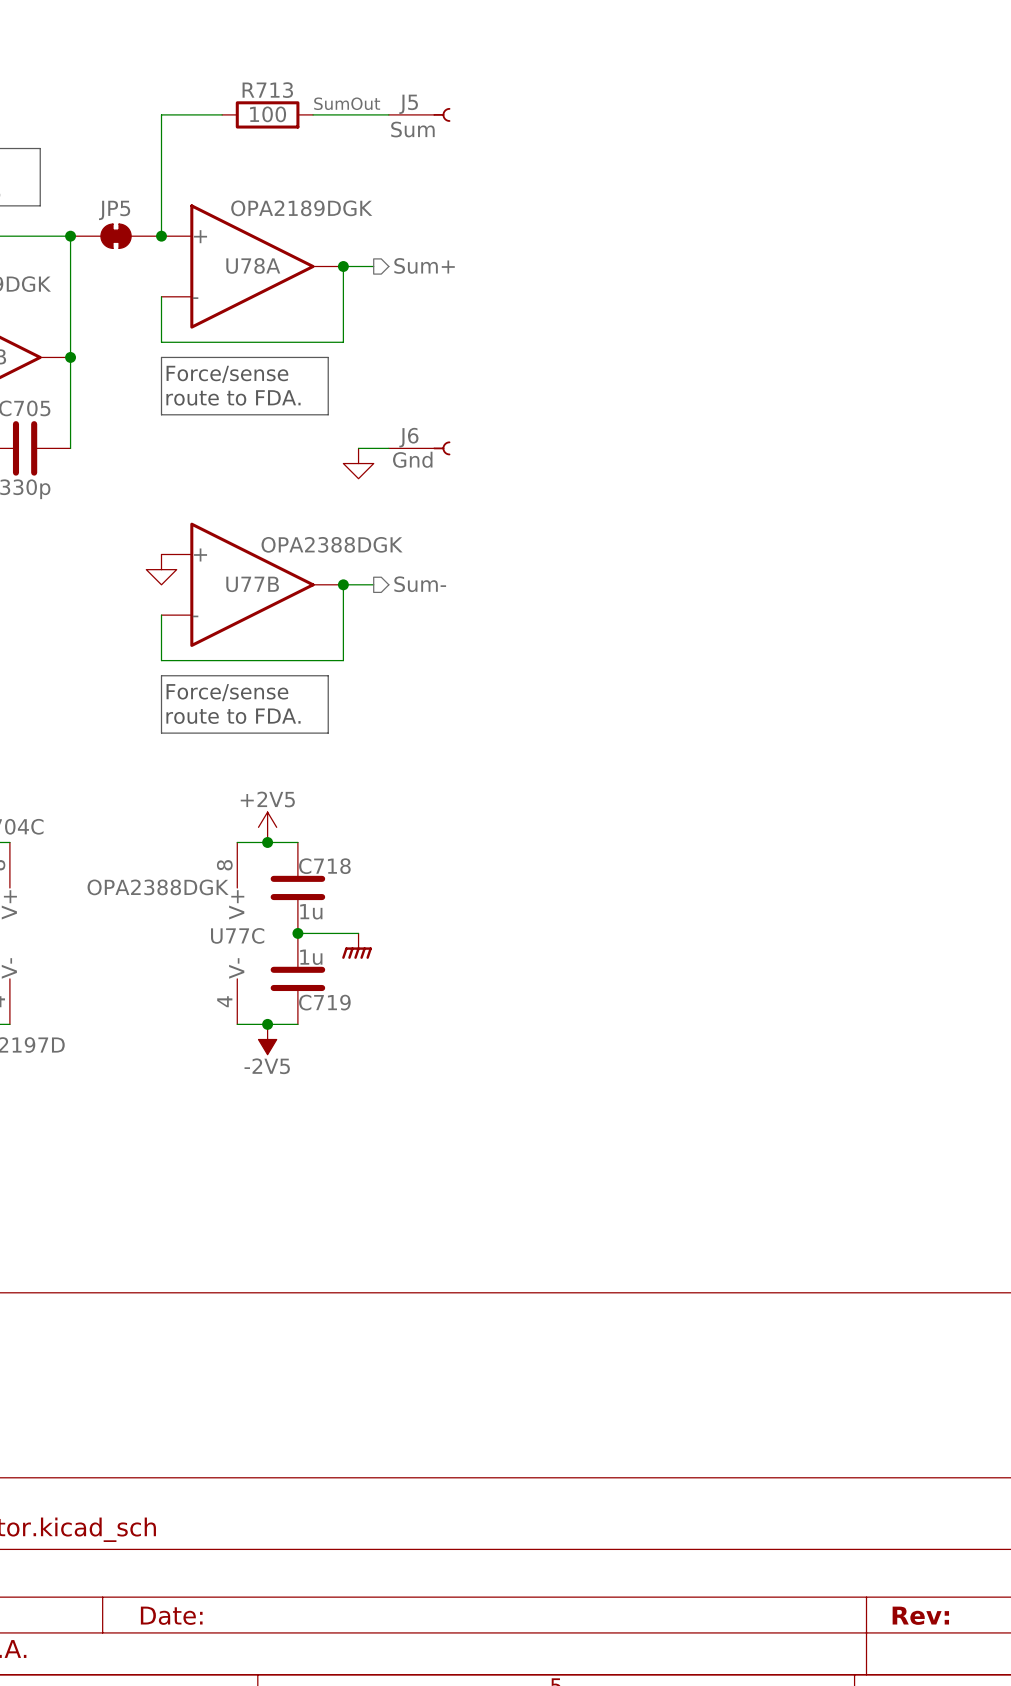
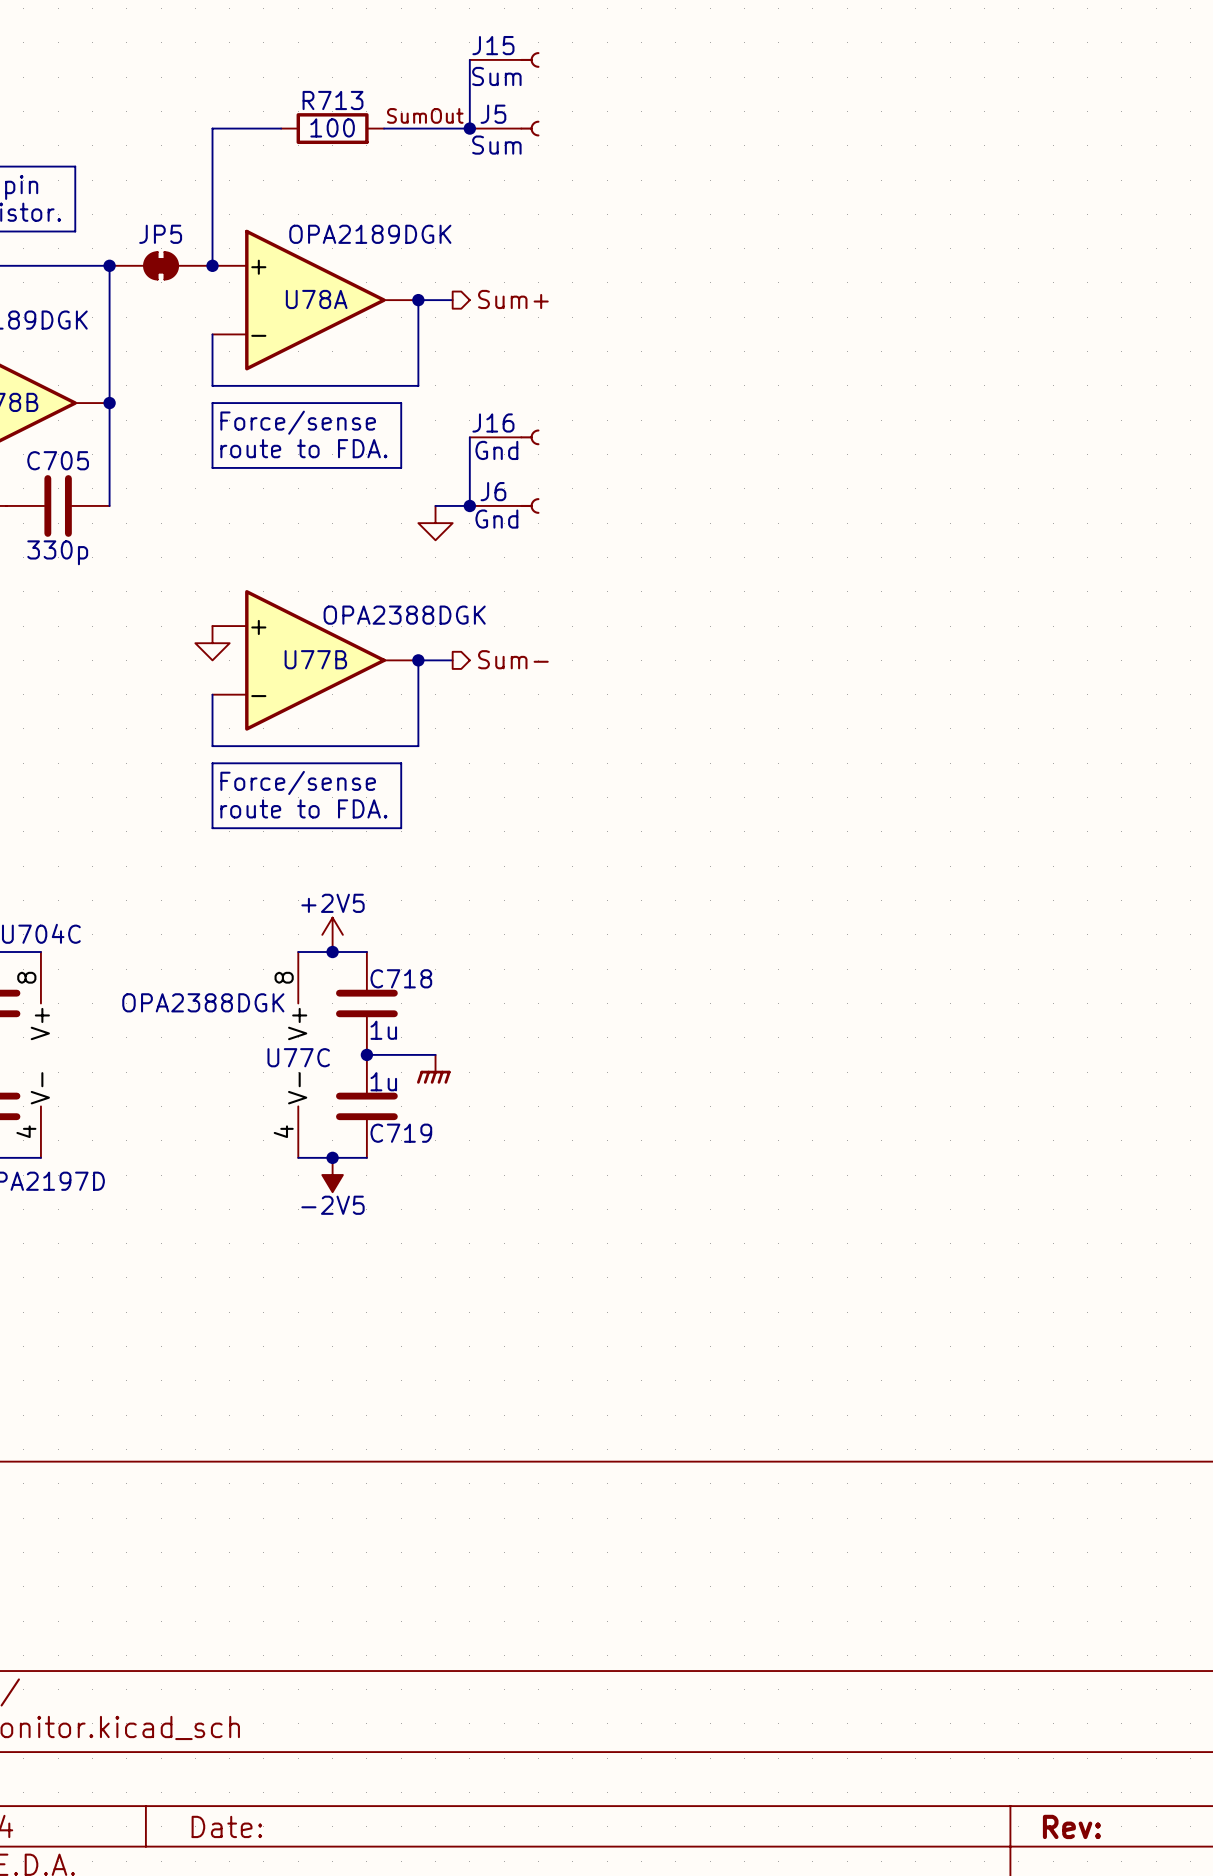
wire: none -> (469, 59) (469, 128)
J15: none -> Sum (504, 59)
junction: none -> (469, 128)
wire: none -> (469, 437) (469, 505)
J16: none -> Gnd (504, 437)
junction: none -> (469, 505)

